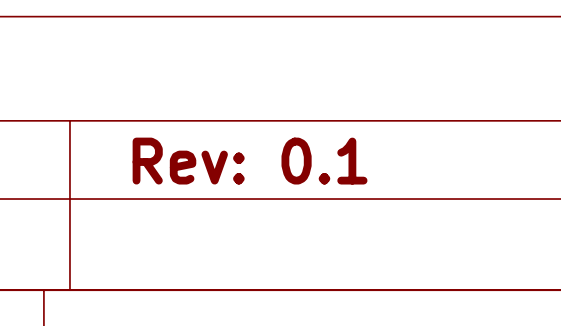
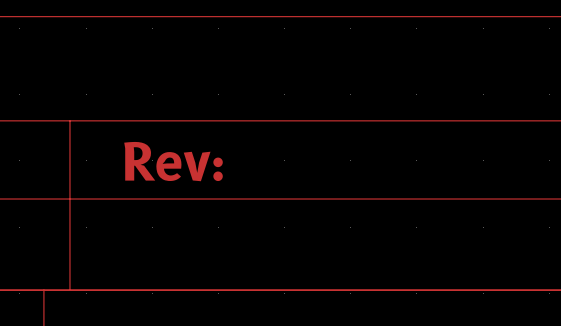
title block: Rev: 0.1 (250, 161) -> Rev: (173, 161)

